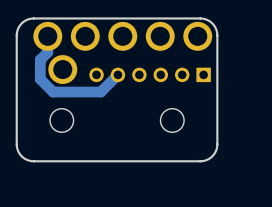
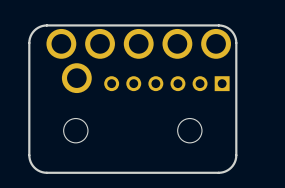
track: (47, 36) (47, 52) (40, 59) (40, 79) (53, 92) (100, 92) (117, 74) -> none

